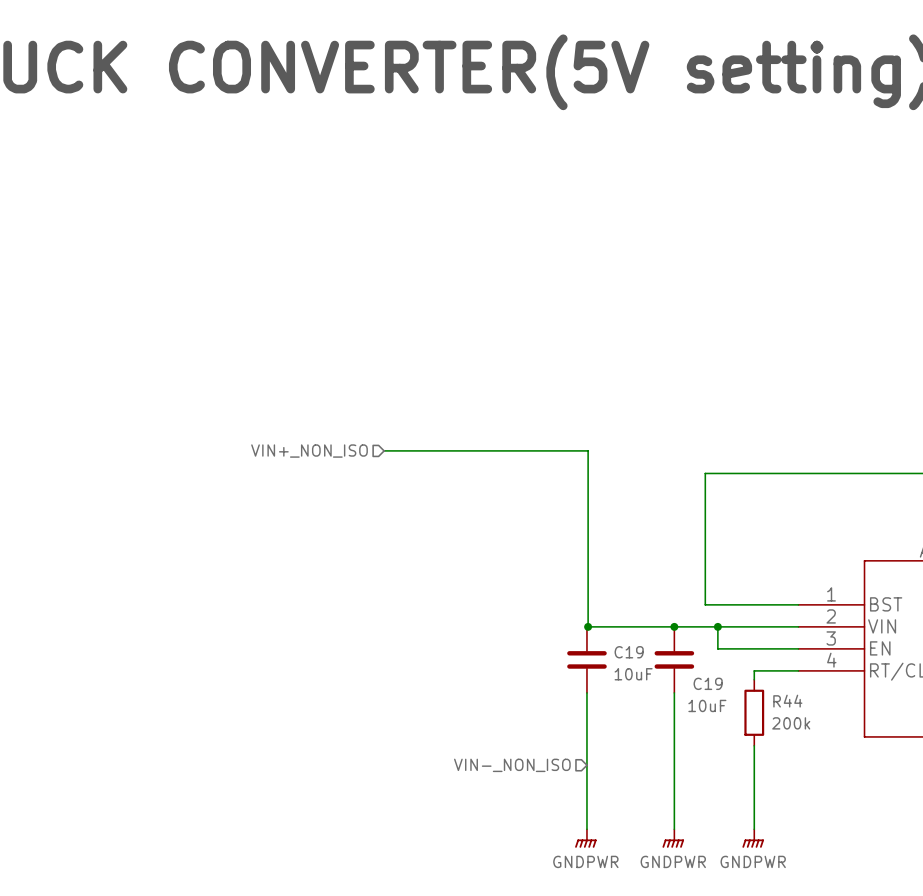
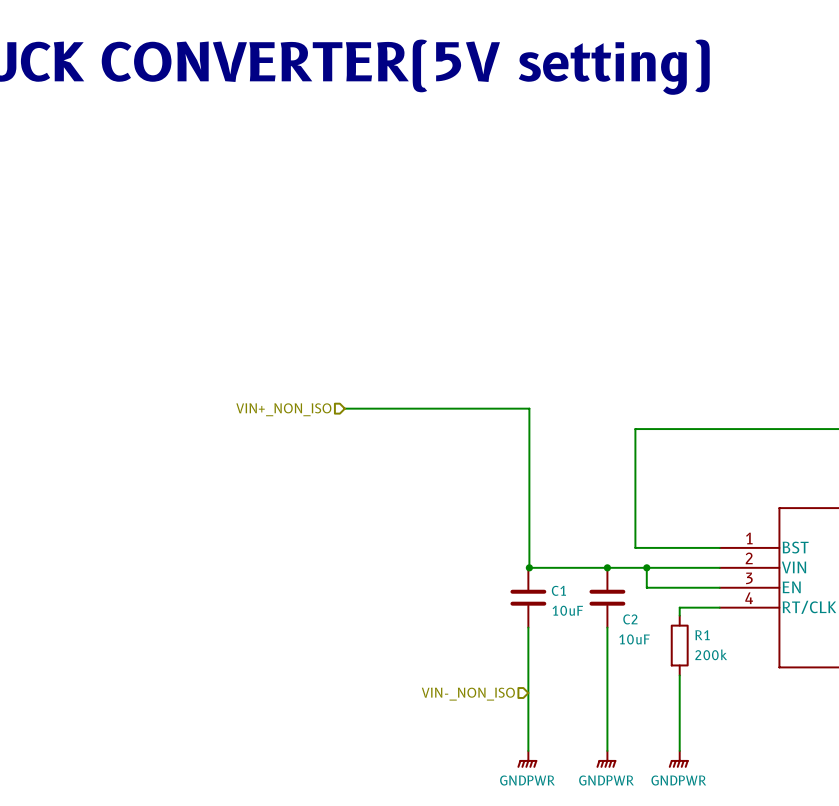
C19 name: C19 (629, 652) -> C1 (558, 590)
C19 name: C19 (708, 683) -> C2 (630, 619)
R44 name: R44 (787, 701) -> R1 (702, 635)

